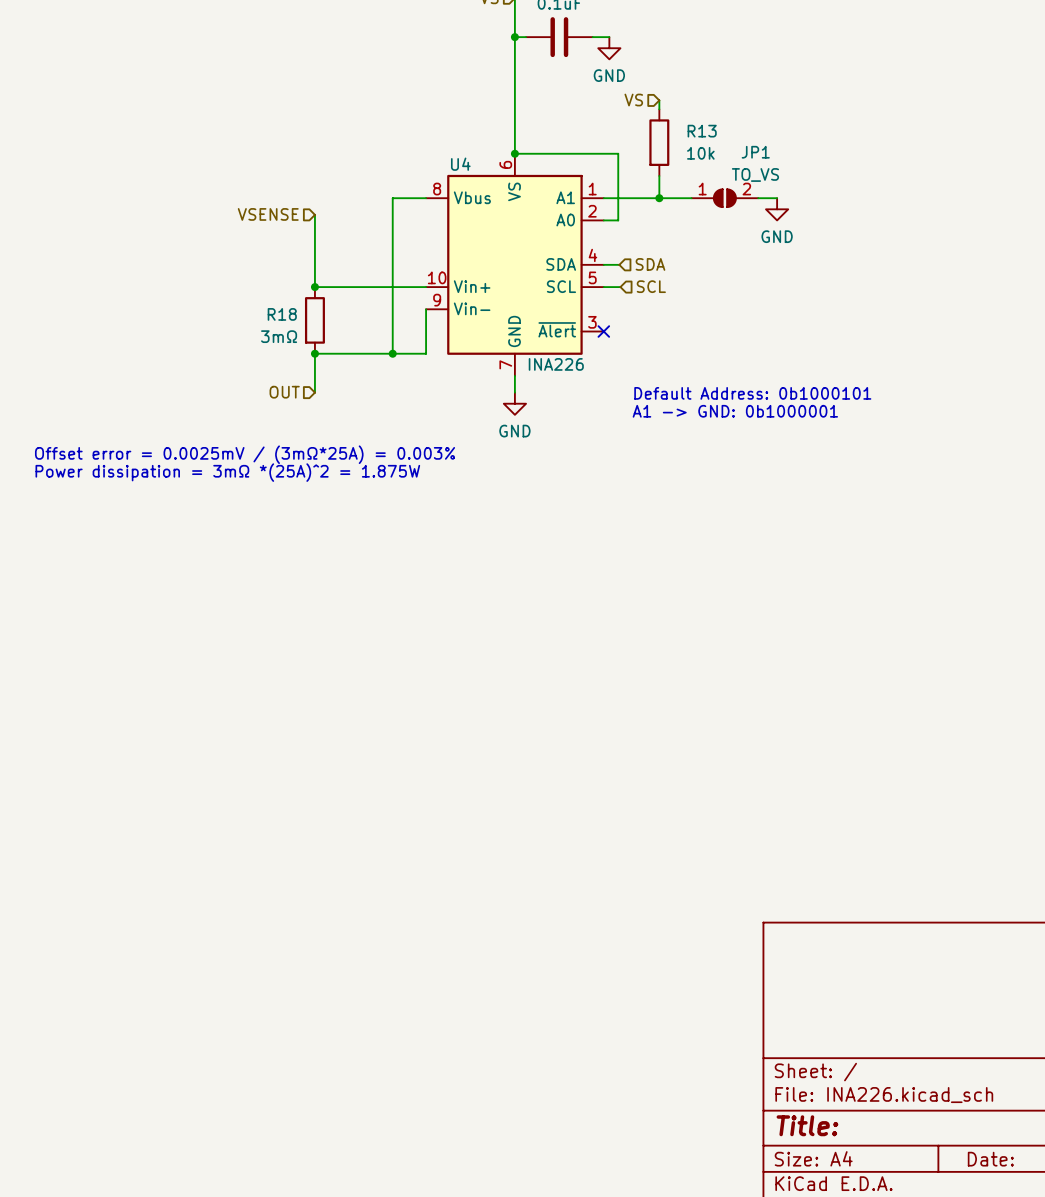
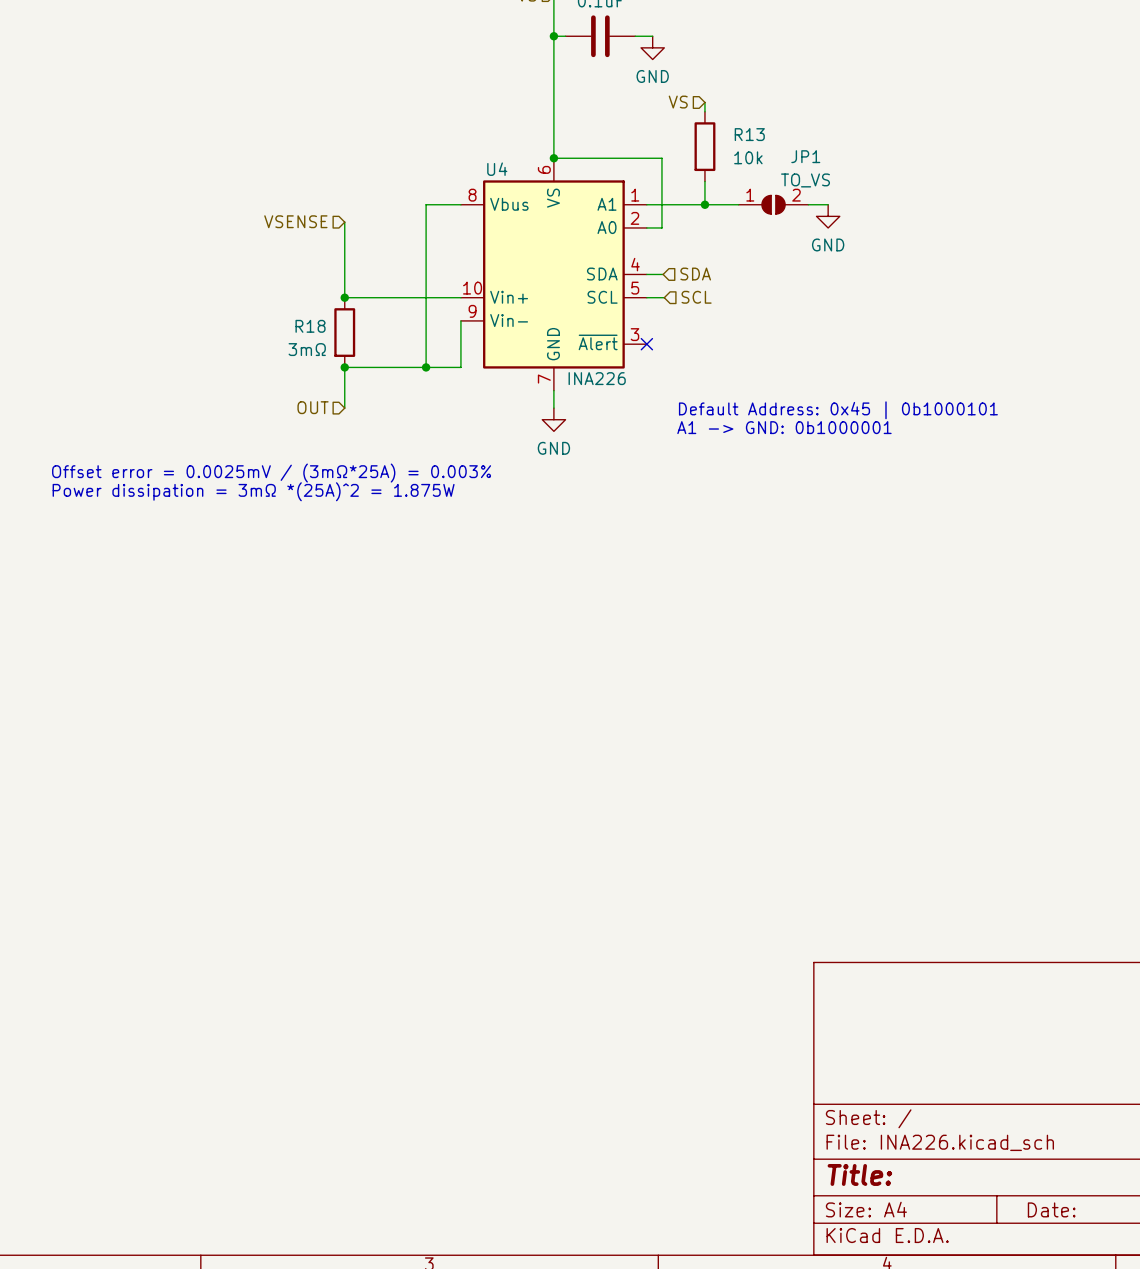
text: Default Address: 0b1000101 (752, 393) -> Default Address: 0x45 | 0b1000101 (838, 410)

